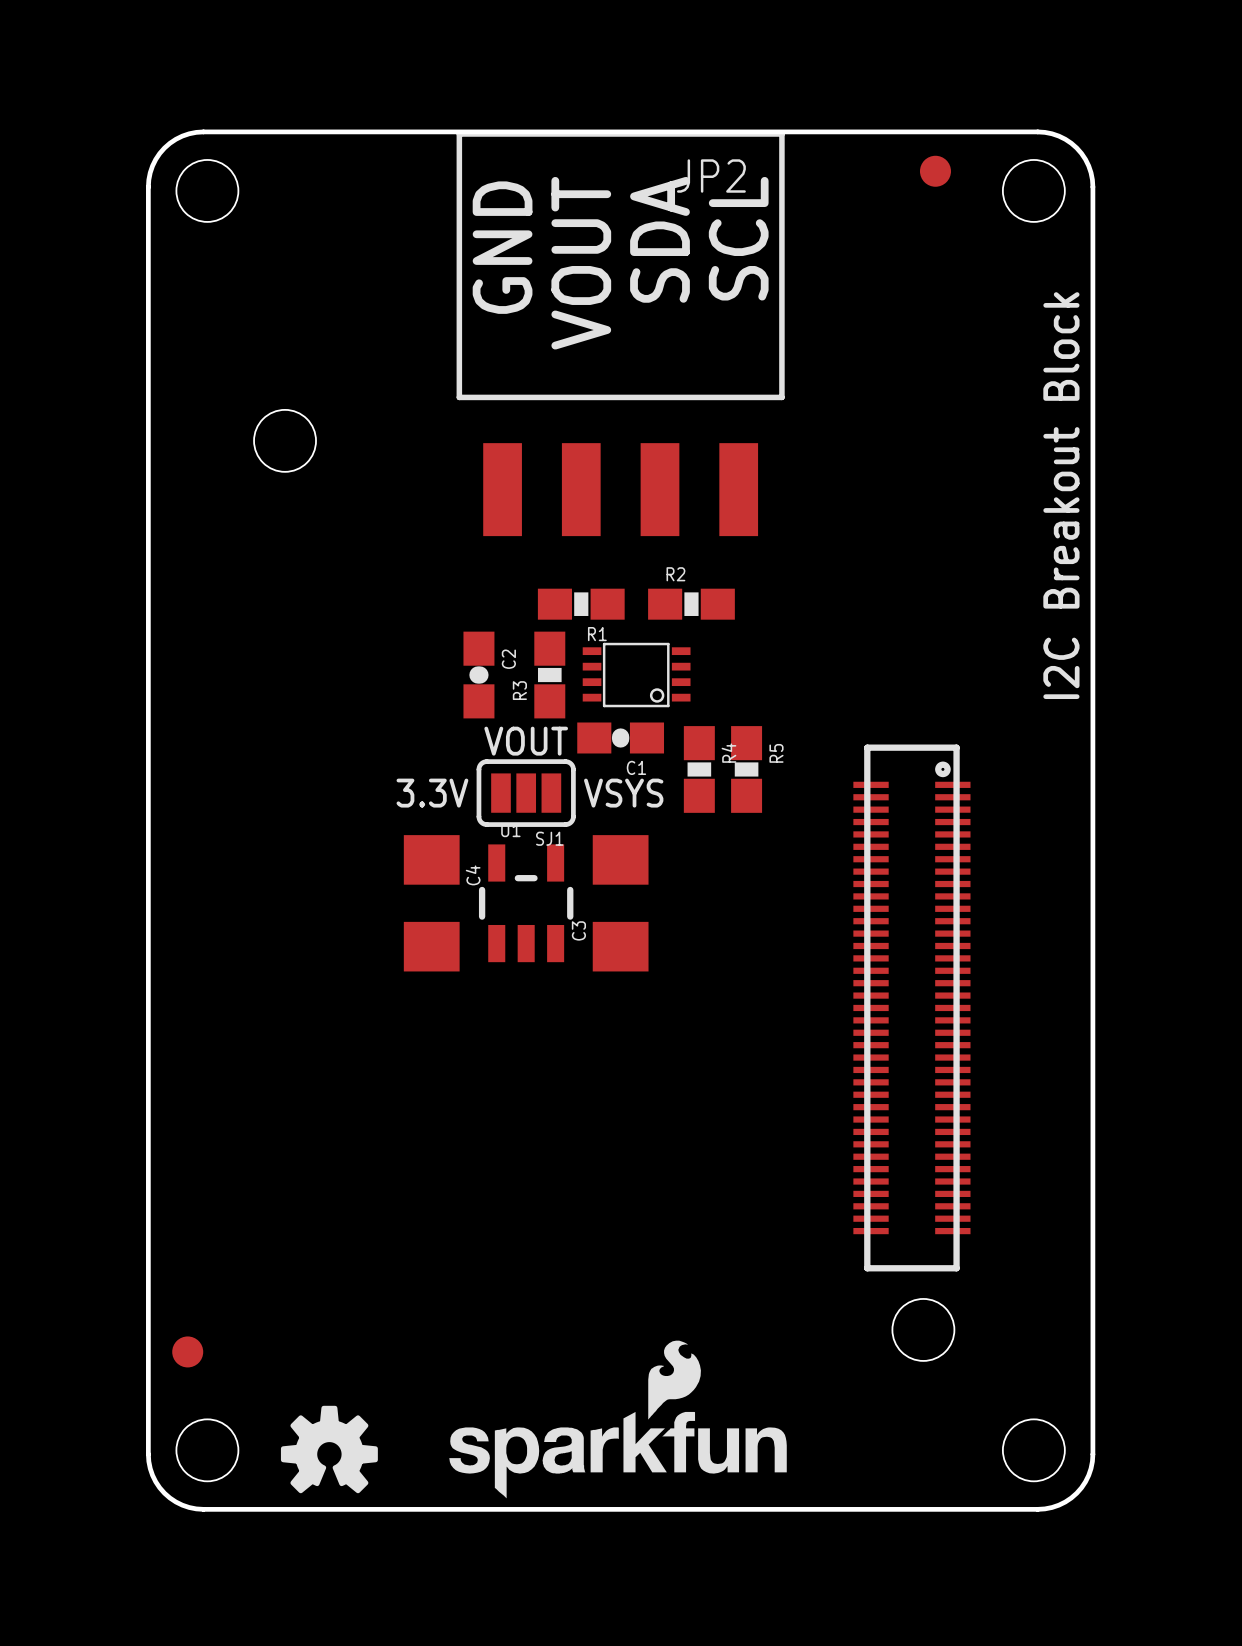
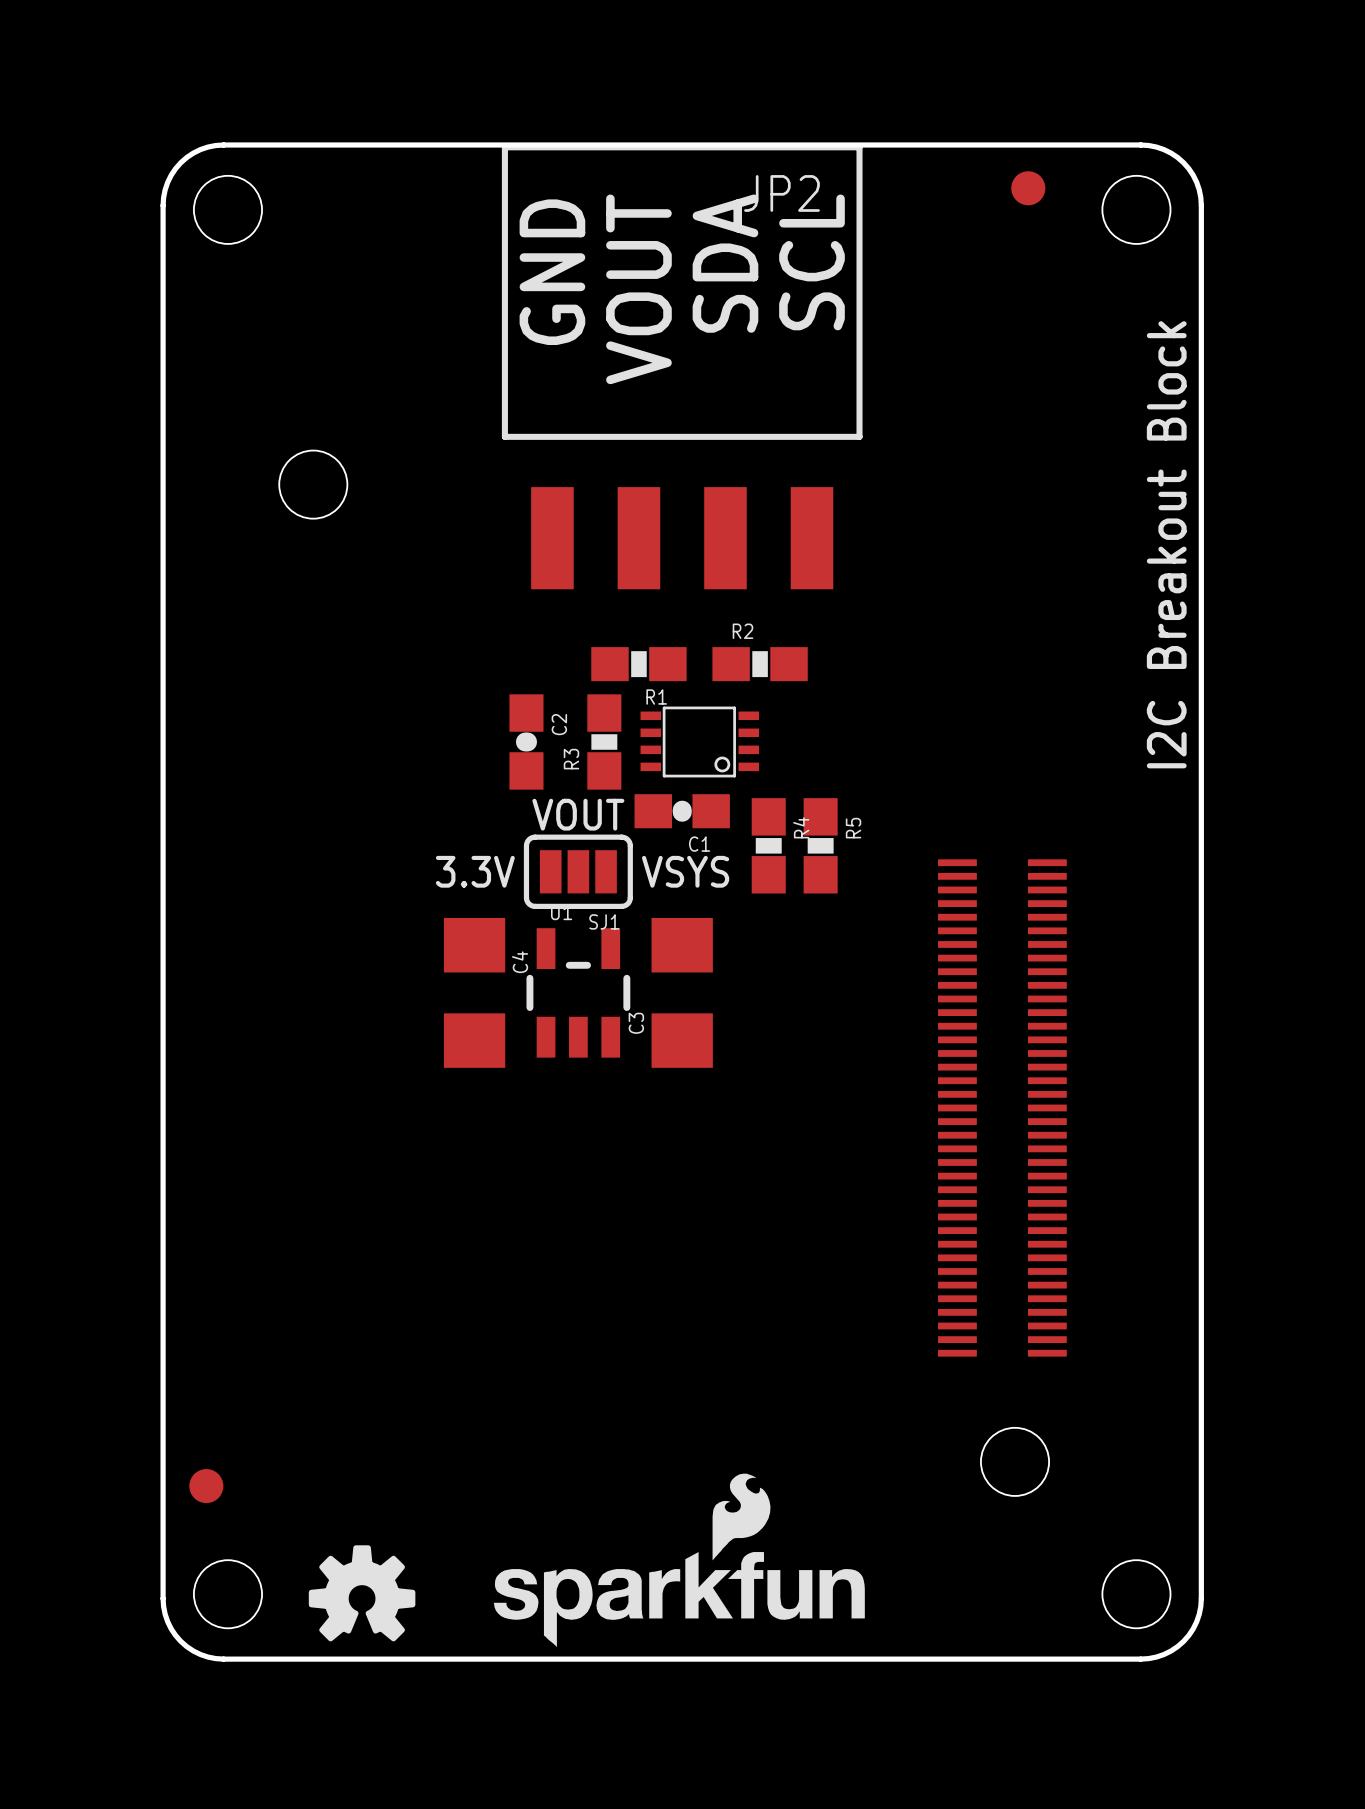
part footprint: [853, 744, 971, 1272] -> [938, 859, 1067, 1357]

